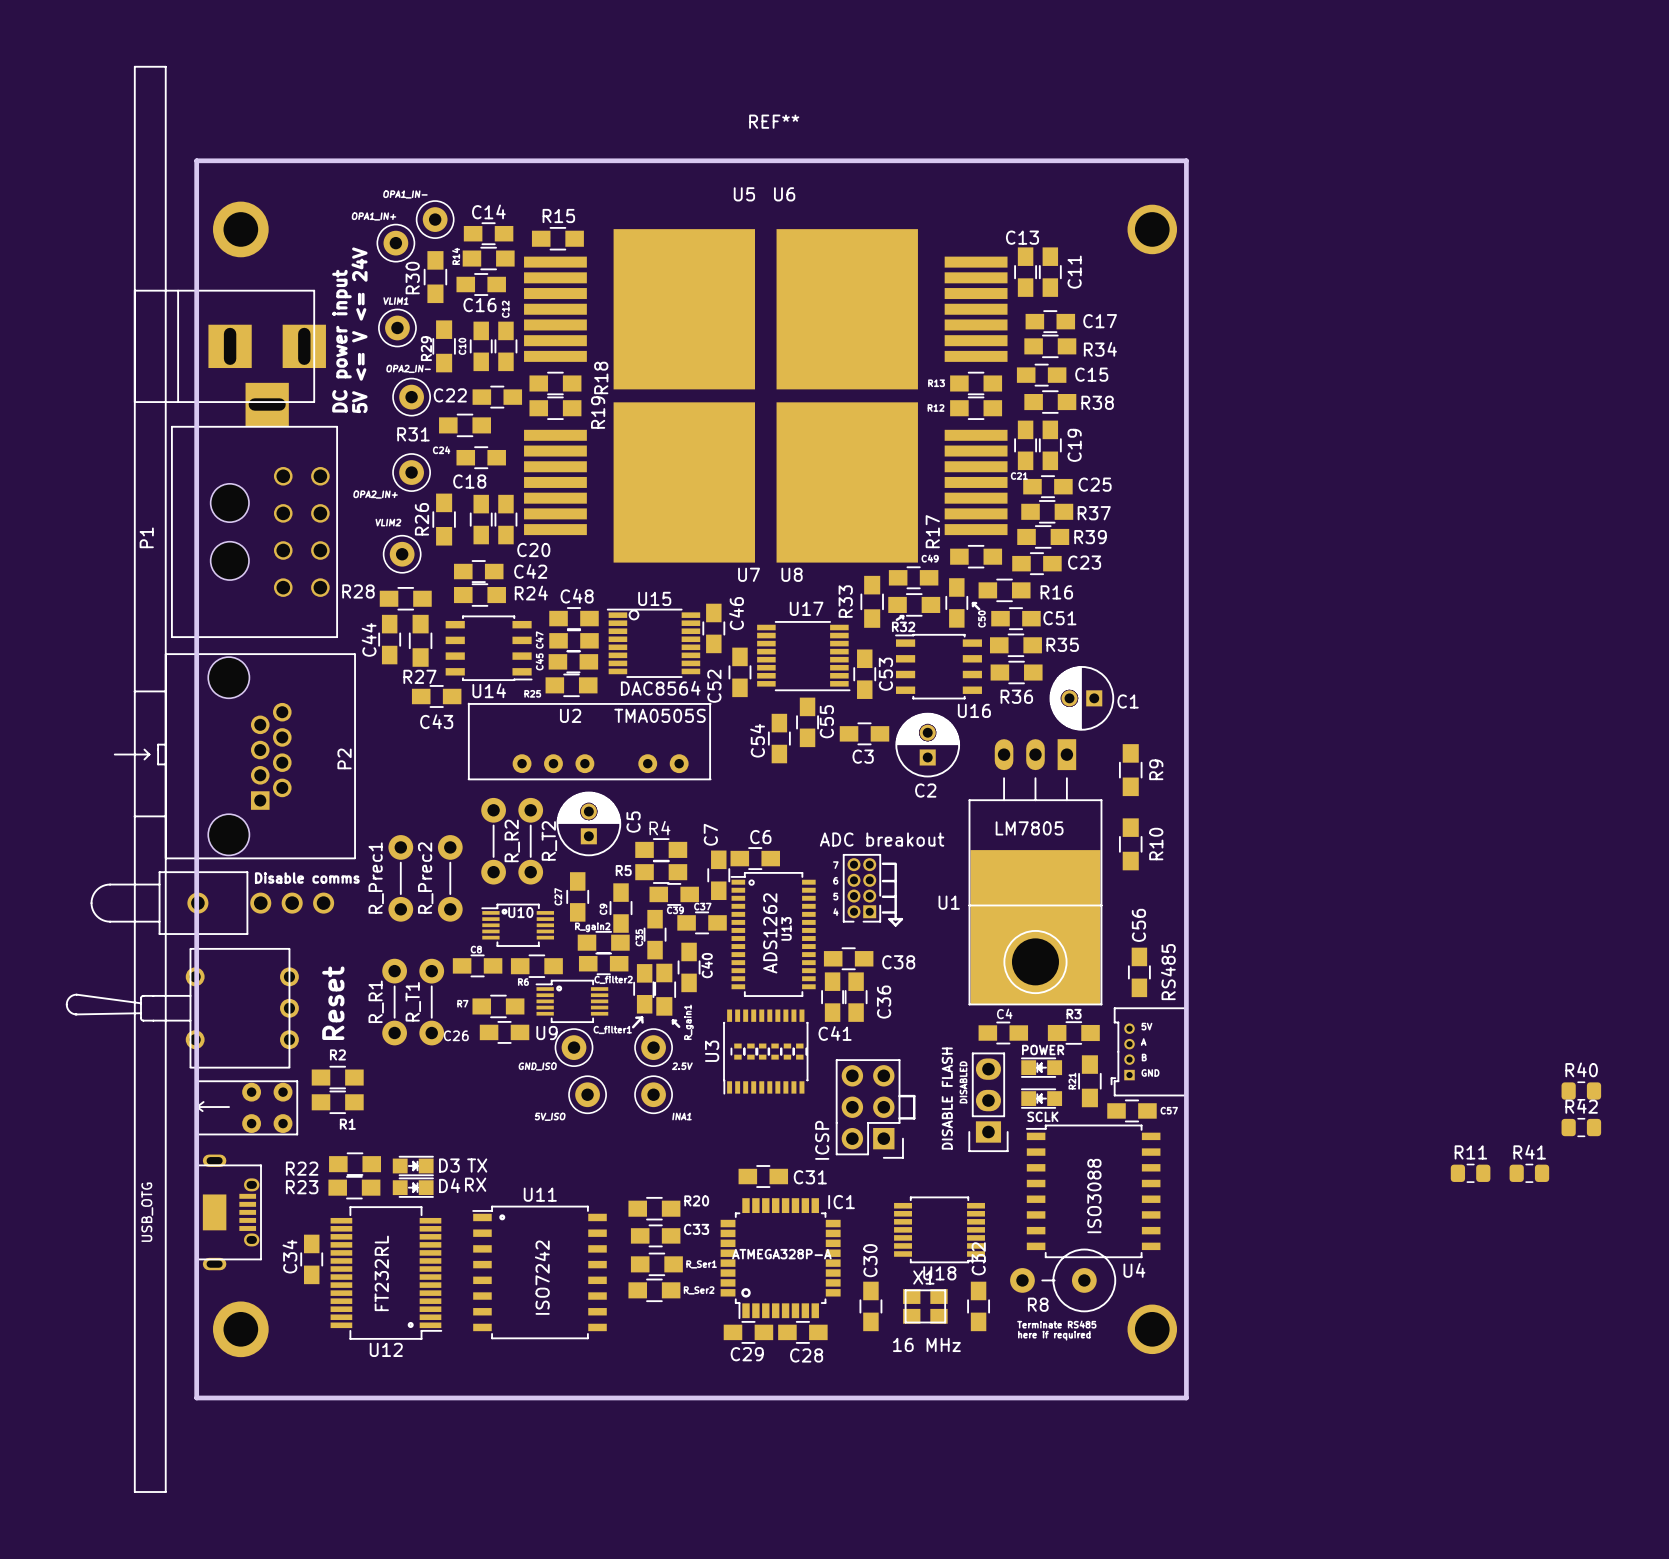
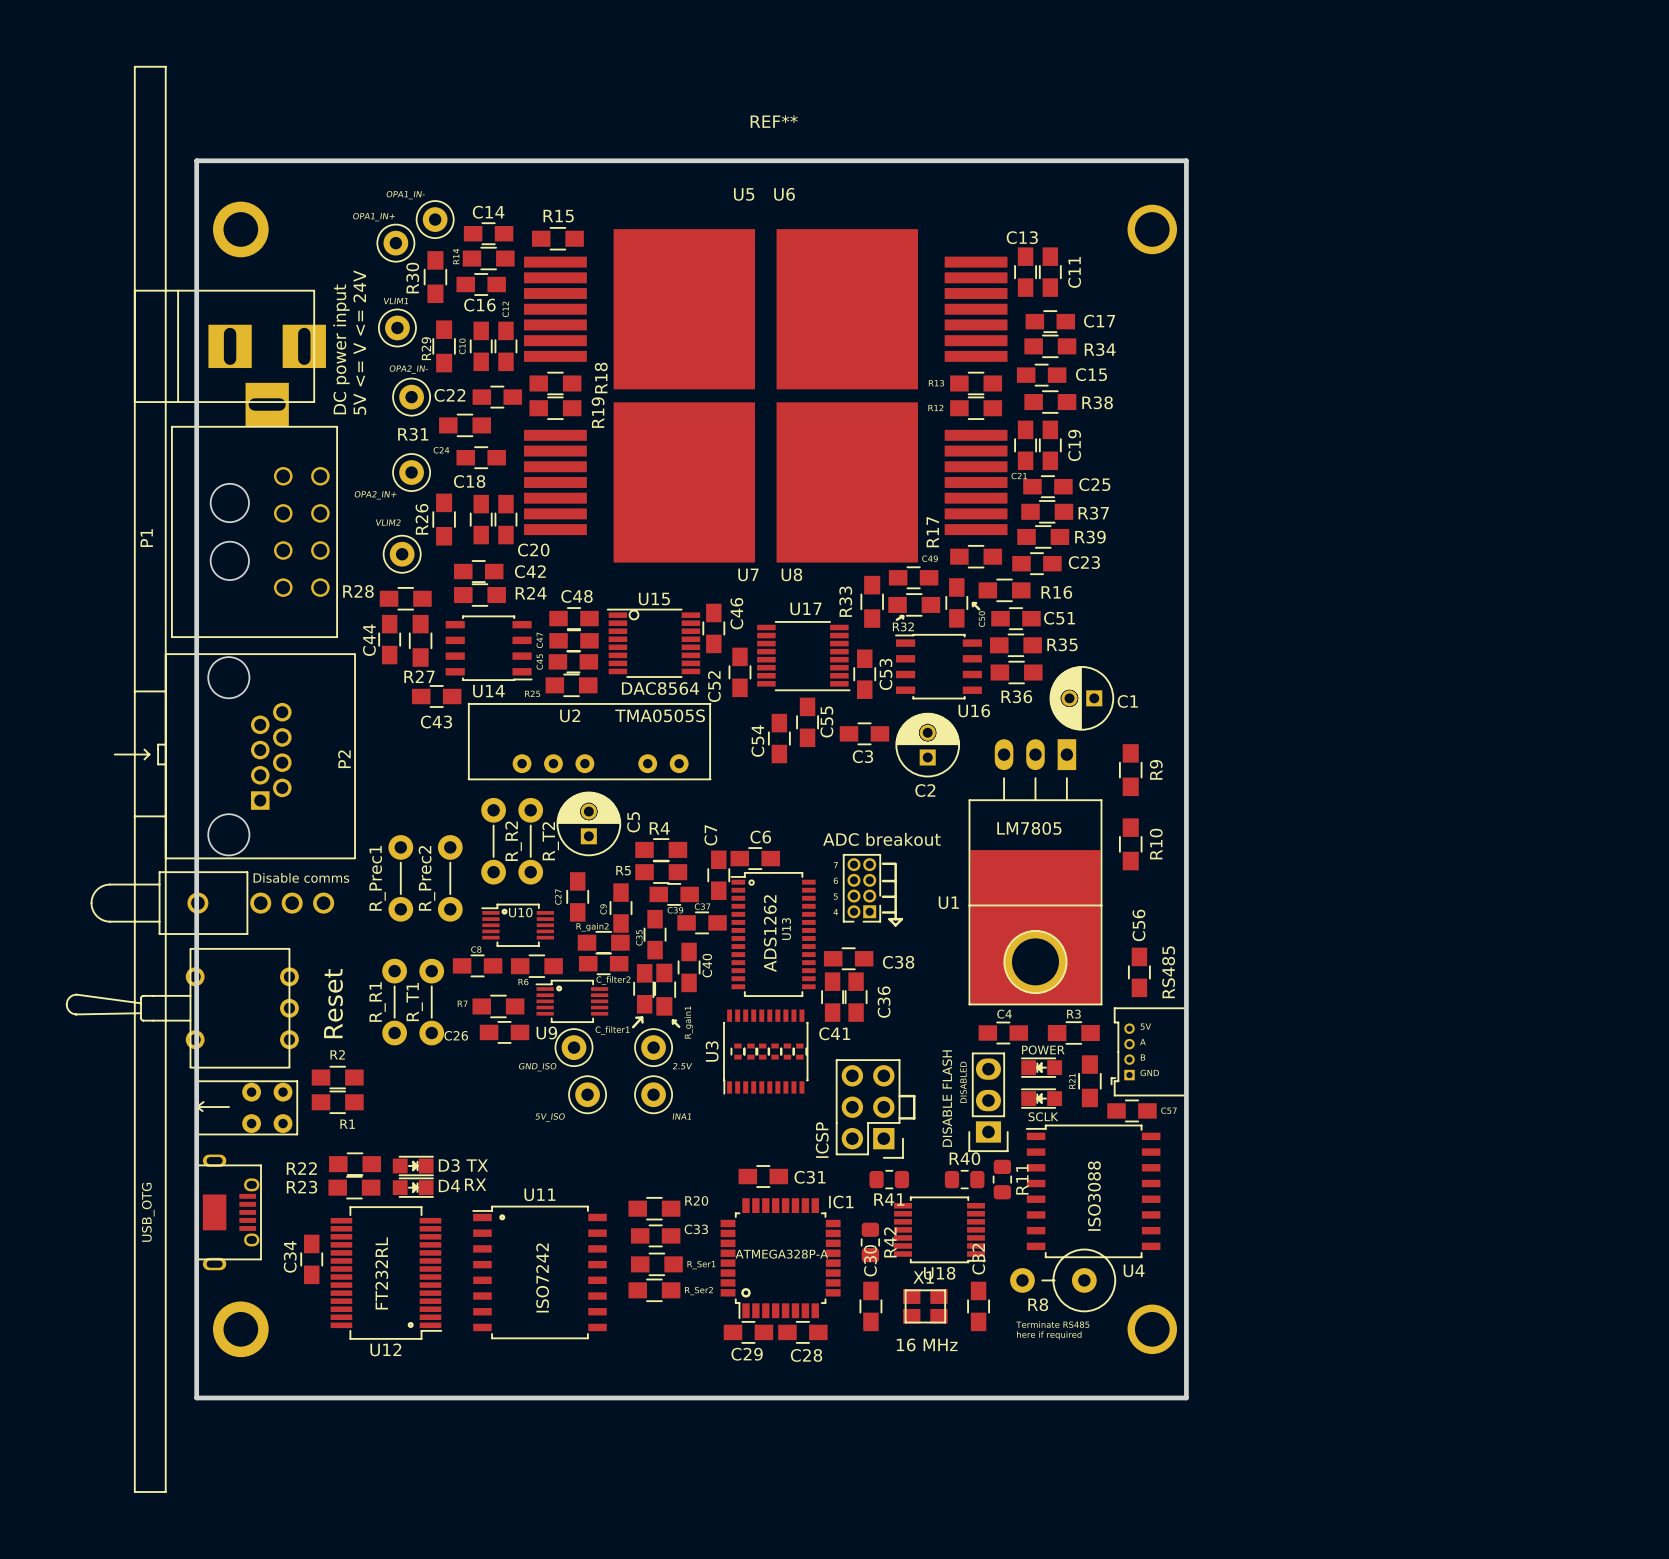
R40 position: (1581, 1091) -> (964, 1179)
R42 rotation: 0° (1581, 1127) -> 90° clockwise (870, 1242)
R42 position: (1581, 1127) -> (870, 1242)
R41 name position: R41 (1529, 1152) -> R41 (889, 1199)
R11 rotation: 0° (1470, 1173) -> 90° clockwise (1002, 1179)
R11 position: (1470, 1173) -> (1002, 1179)
R41 position: (1529, 1173) -> (889, 1179)

